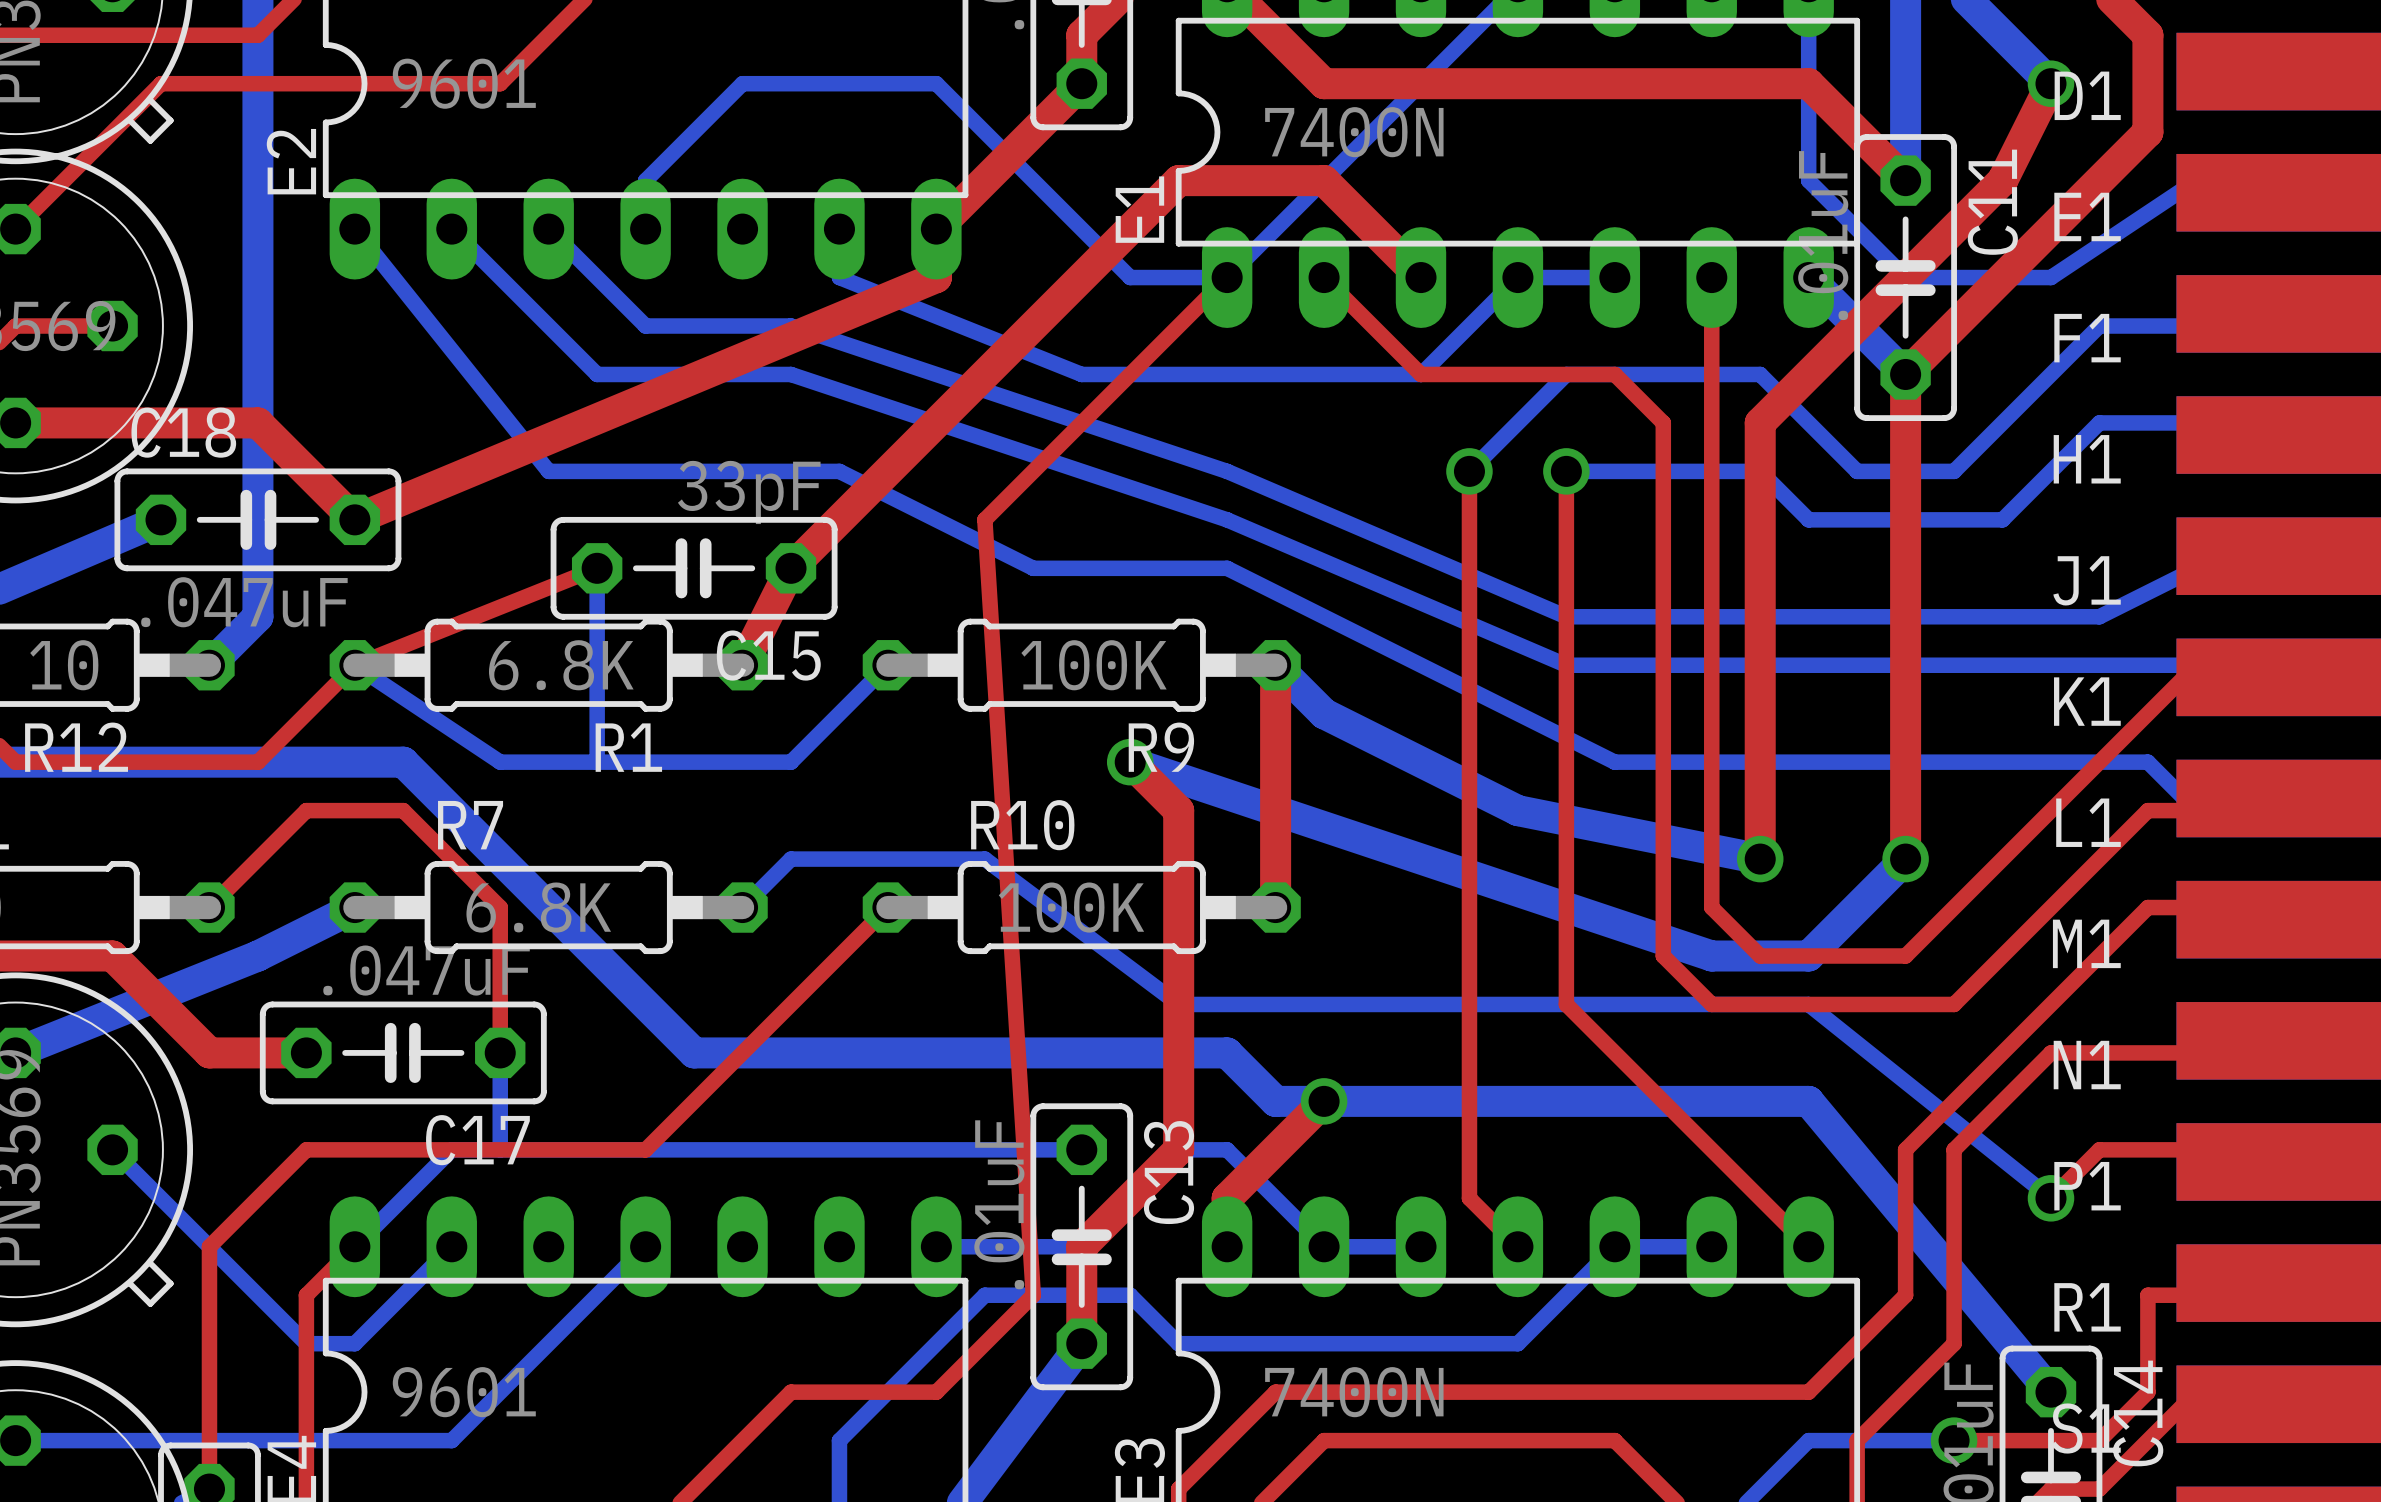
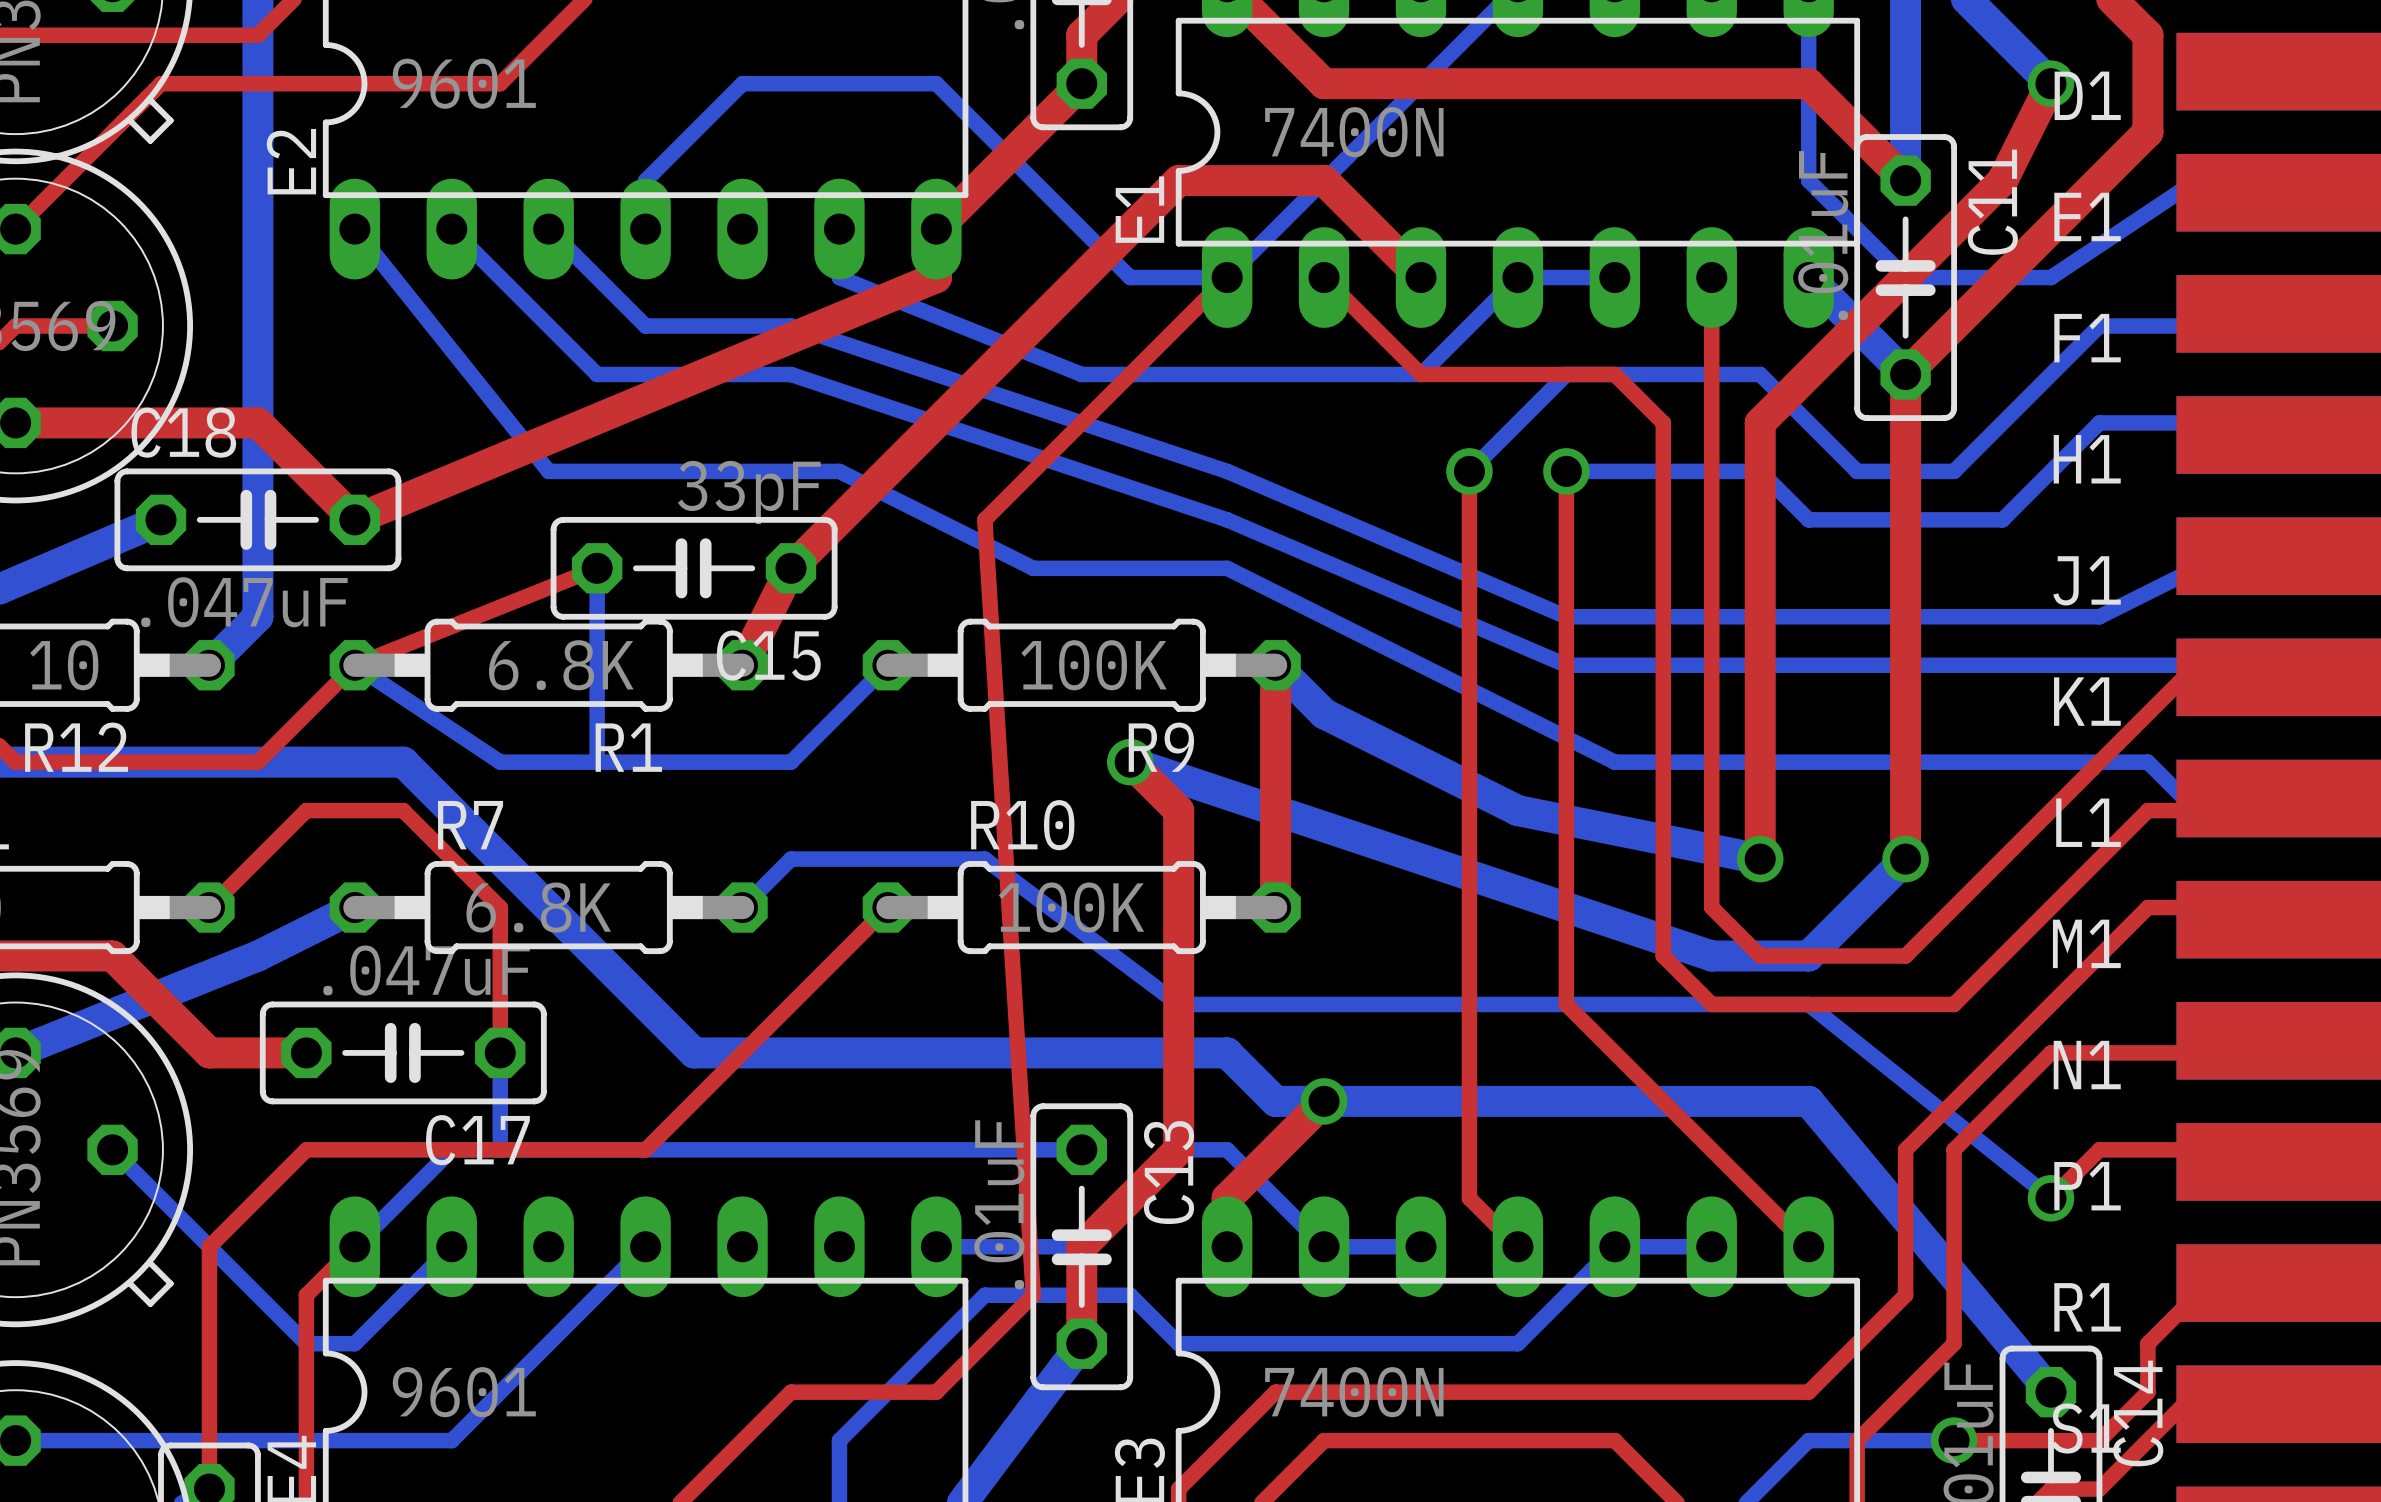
top track: (2196, 1295) (2147, 1295) (2147, 1343) -> (2196, 1295) (2147, 1343)

